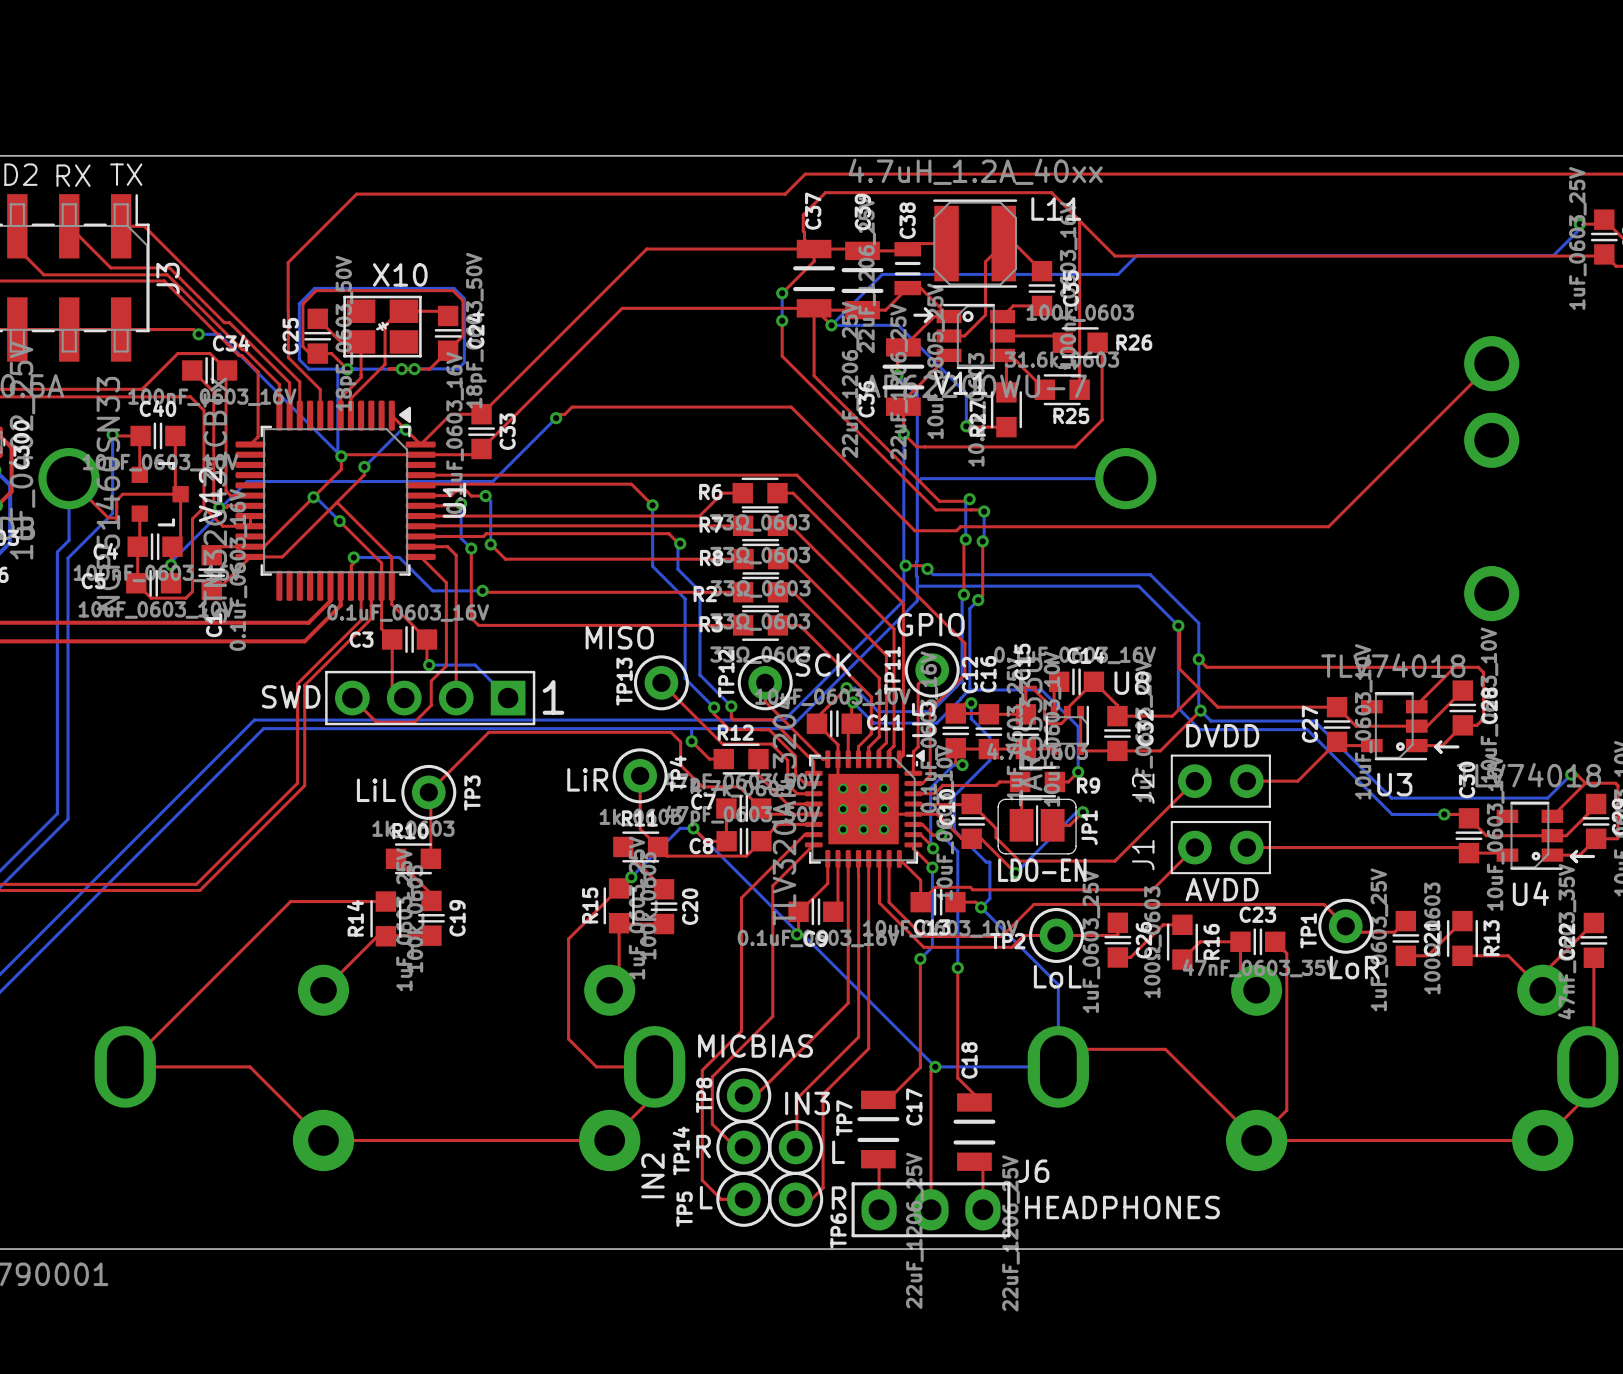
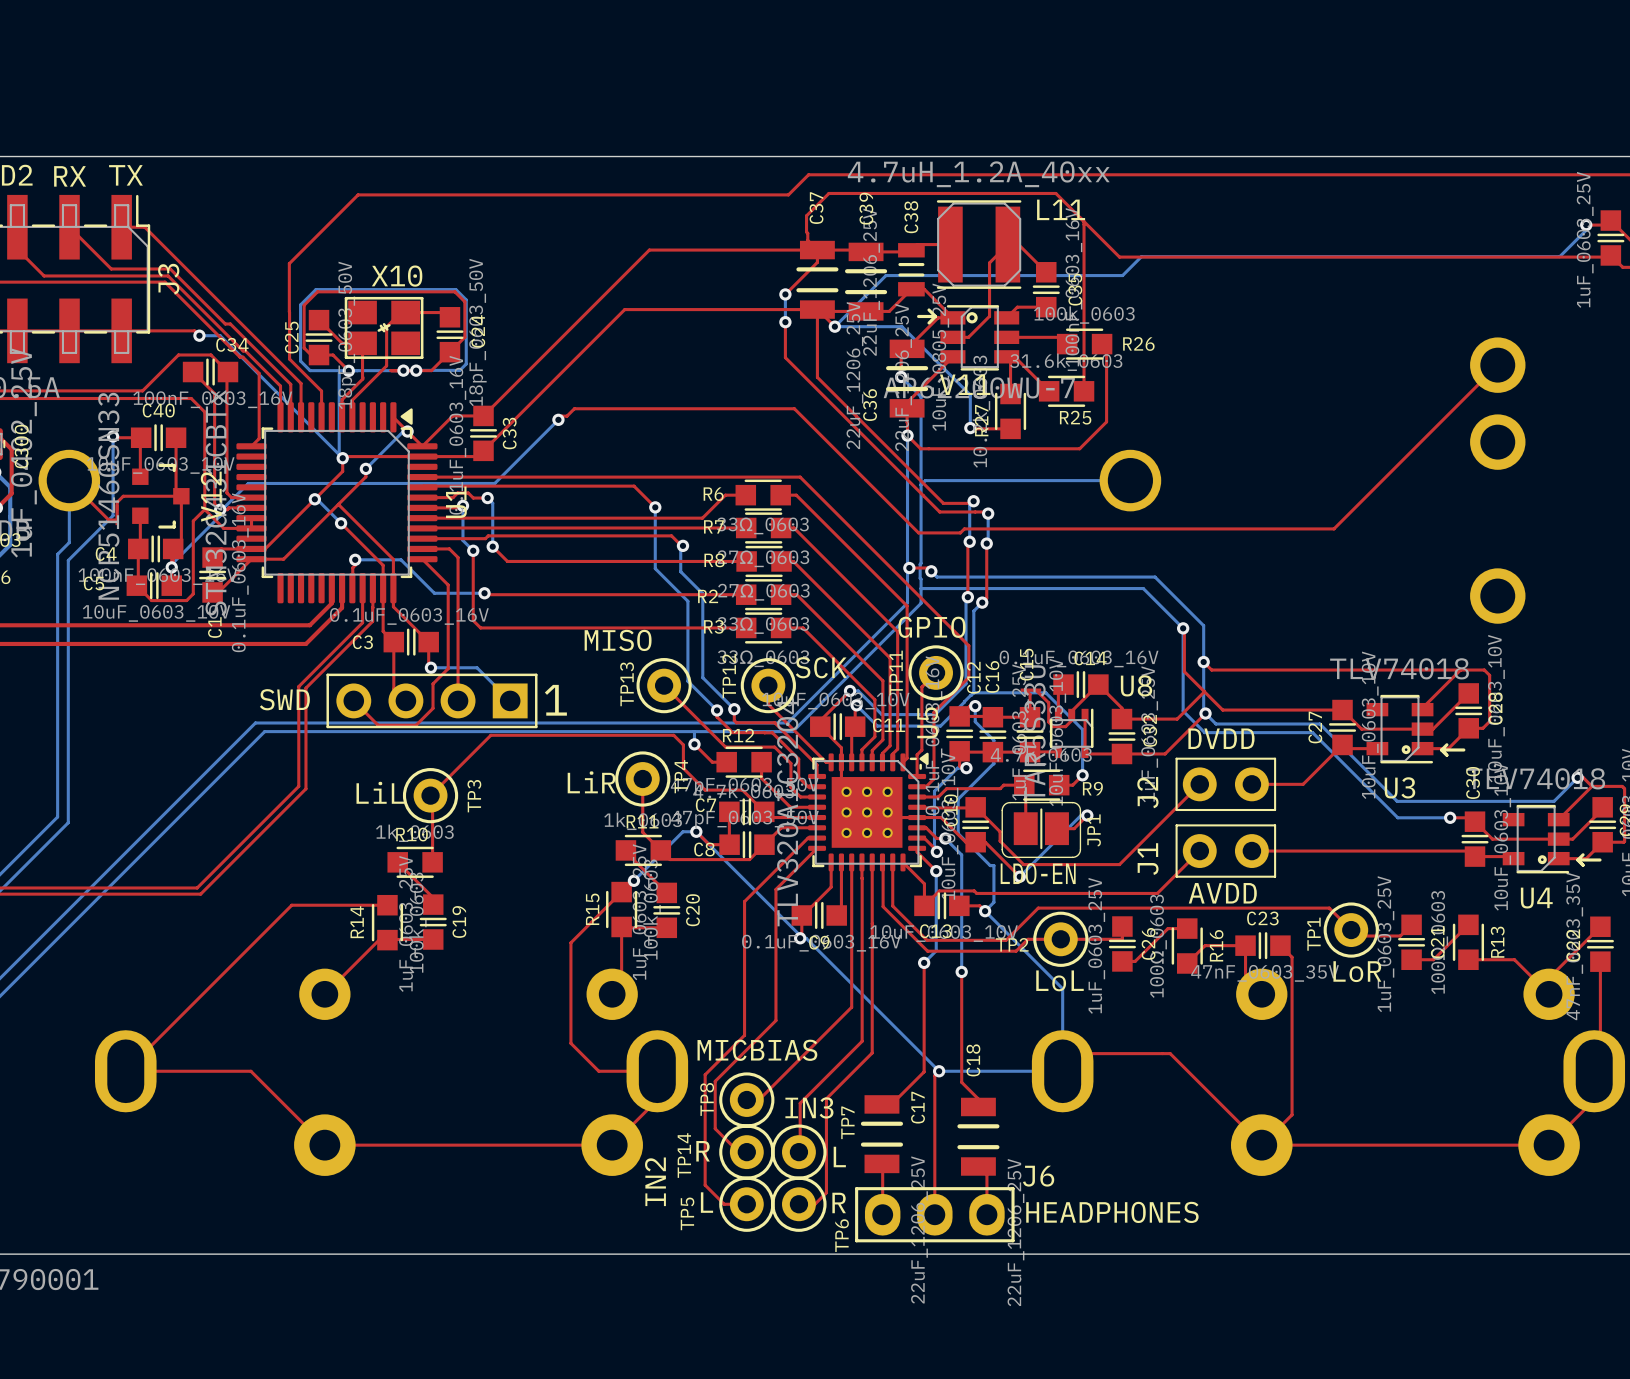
R7 value: 33Ω_0603 (760, 555) -> 27Ω_0603 (763, 558)
R8 value: 33Ω_0603 (760, 588) -> 27Ω_0603 (763, 592)

